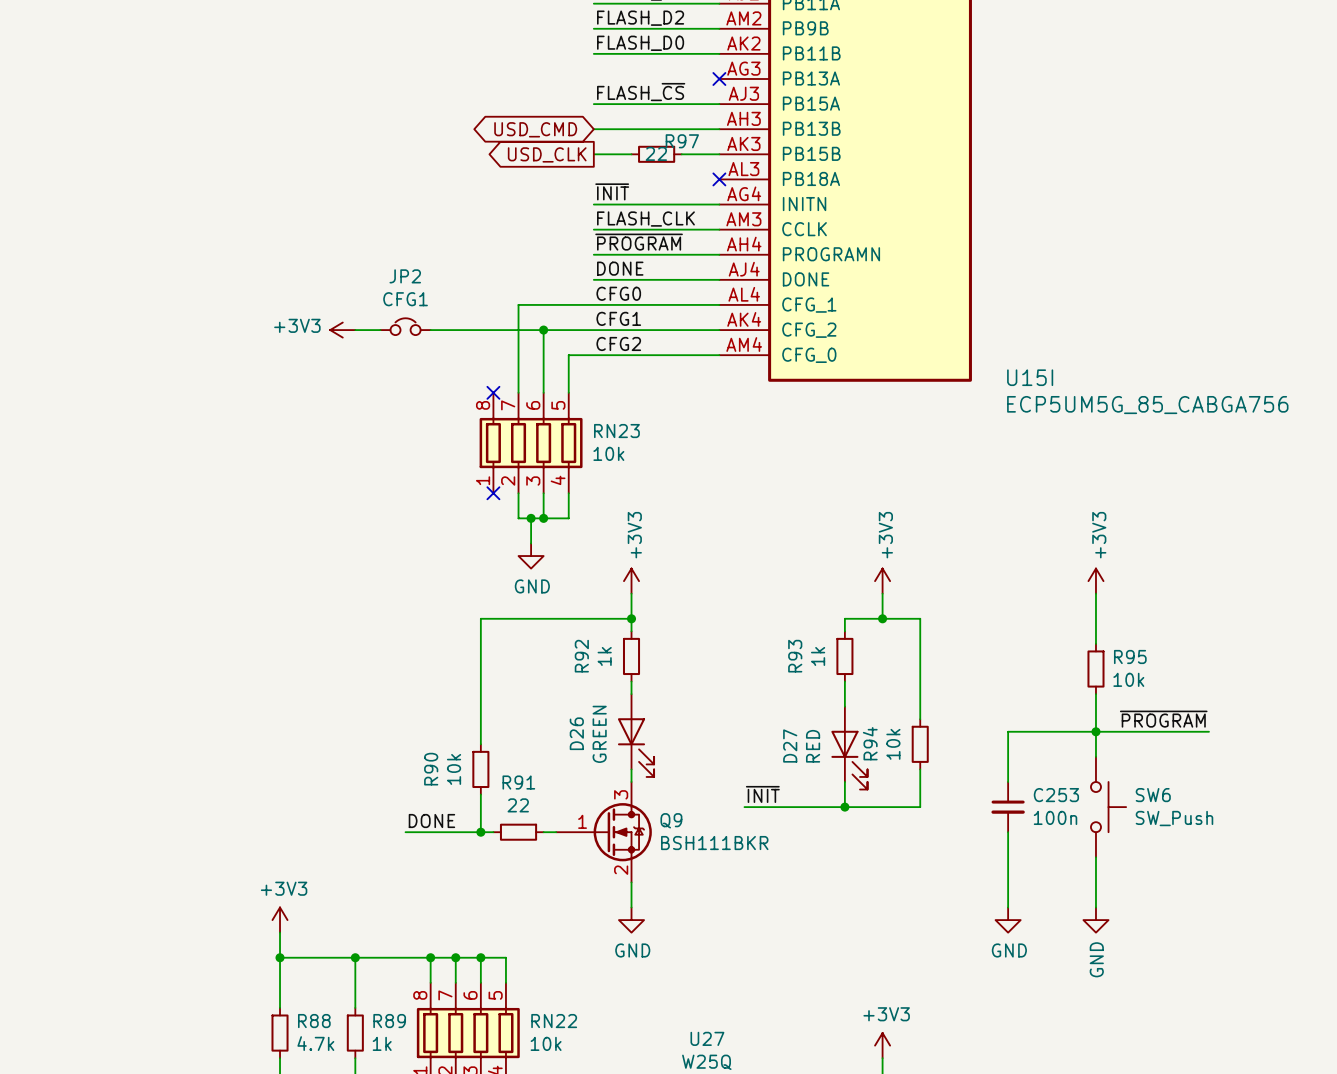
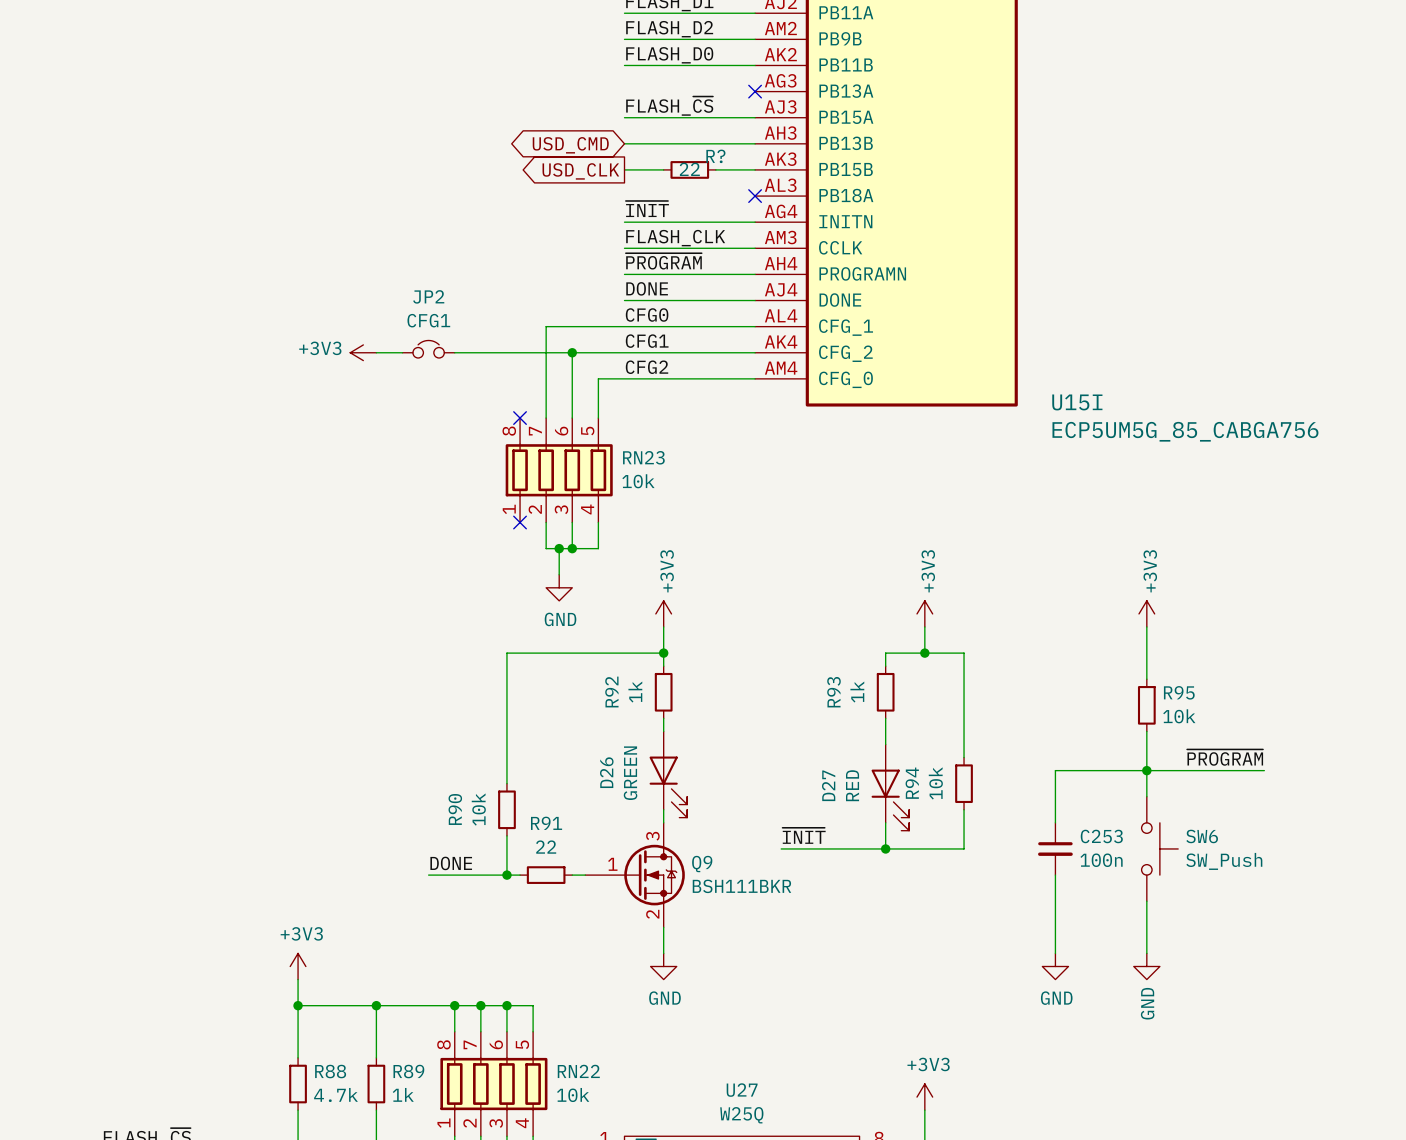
R97 name: R97 (682, 141) -> R? (715, 156)

